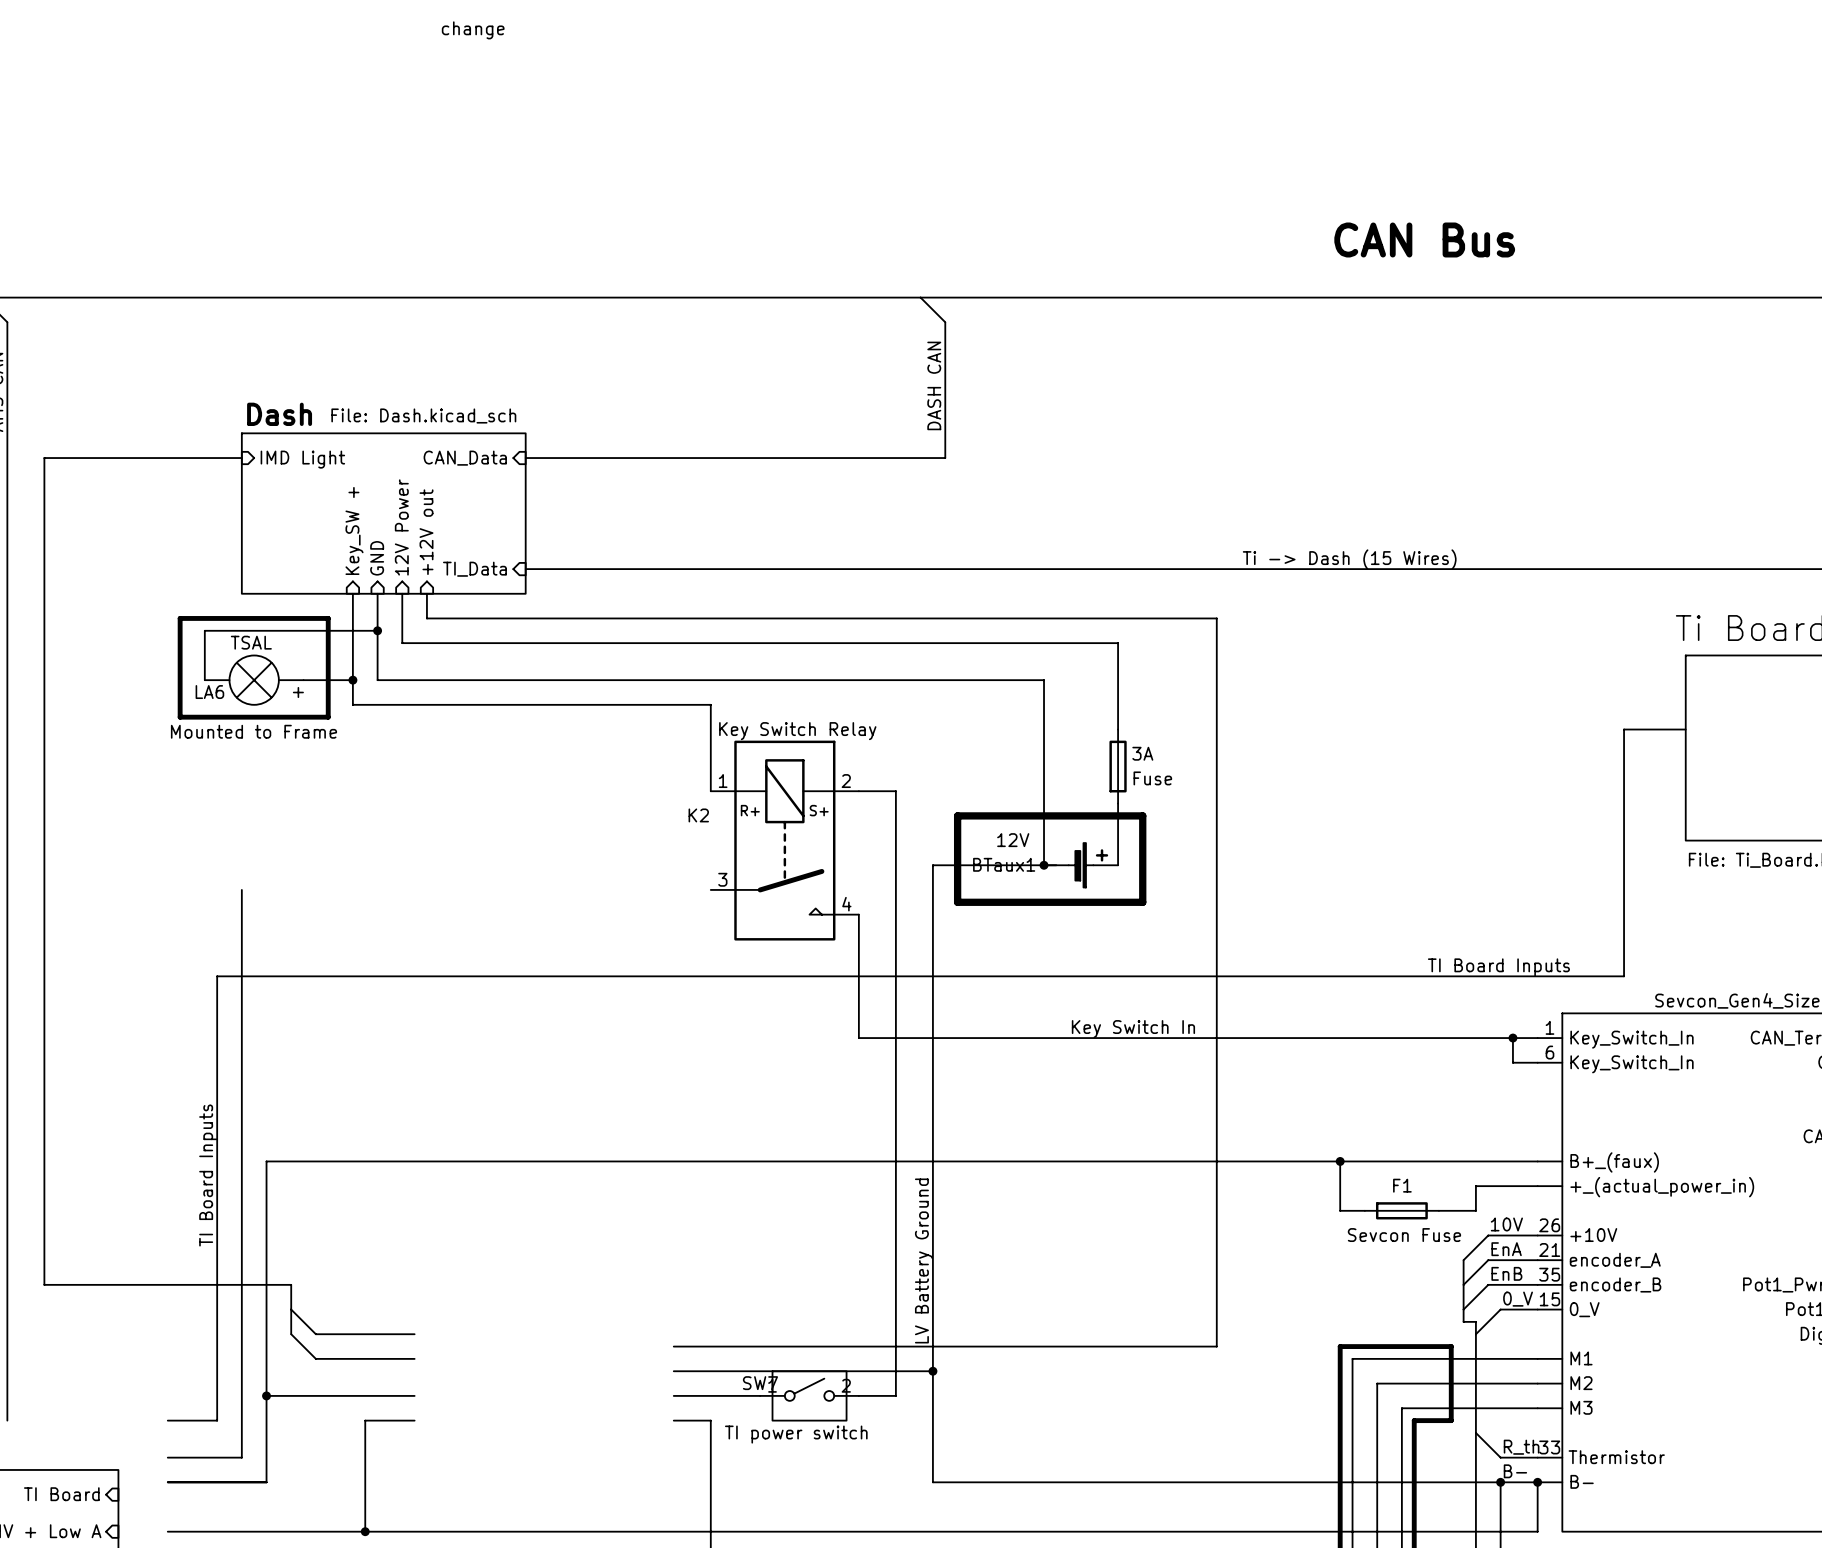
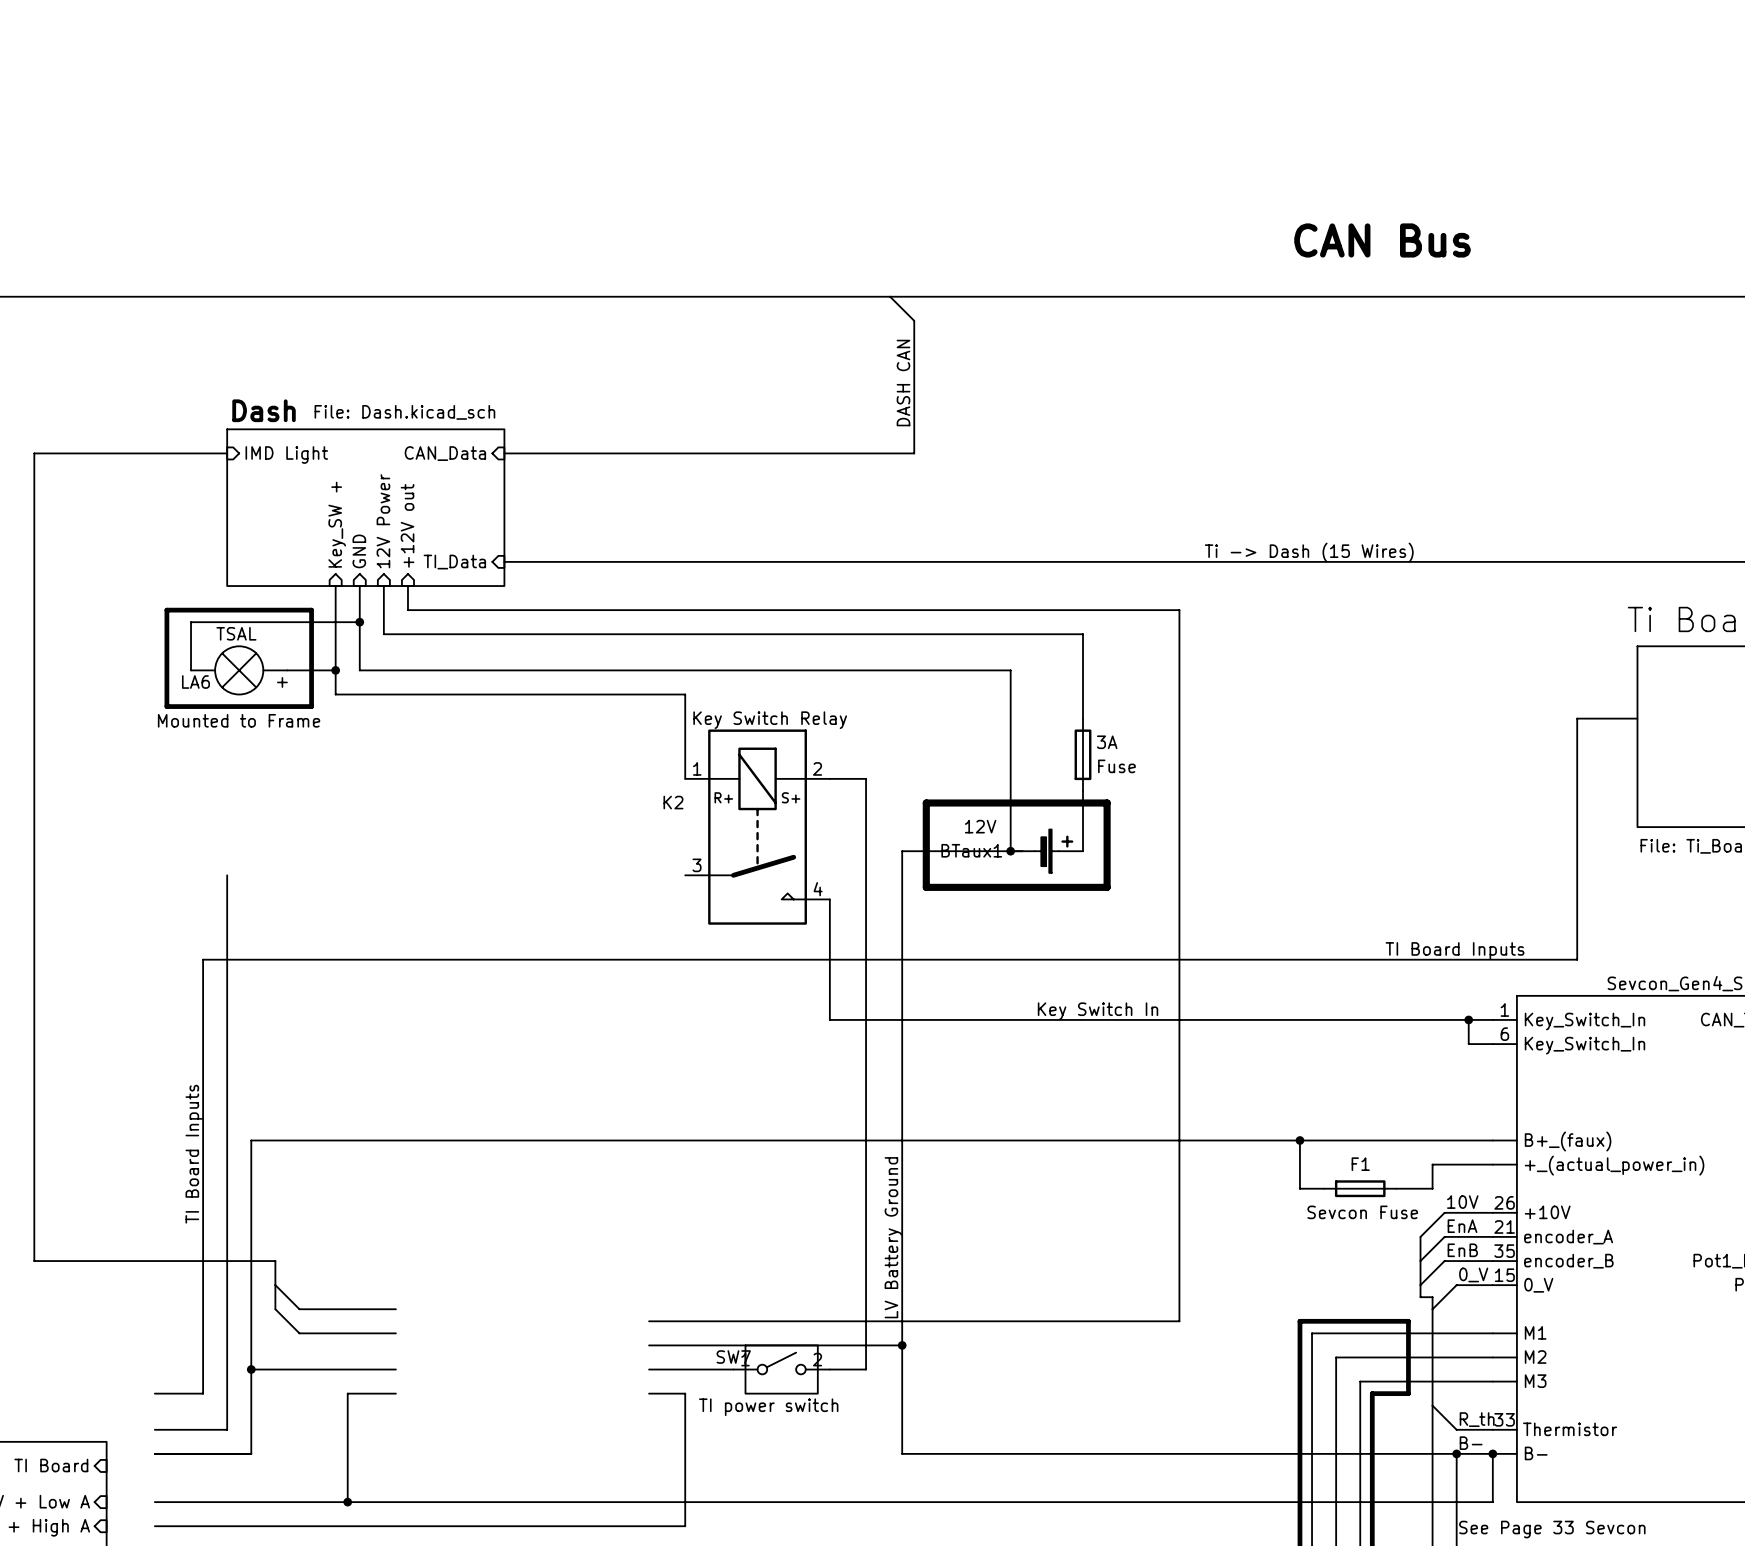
text: change (473, 30) -> none

